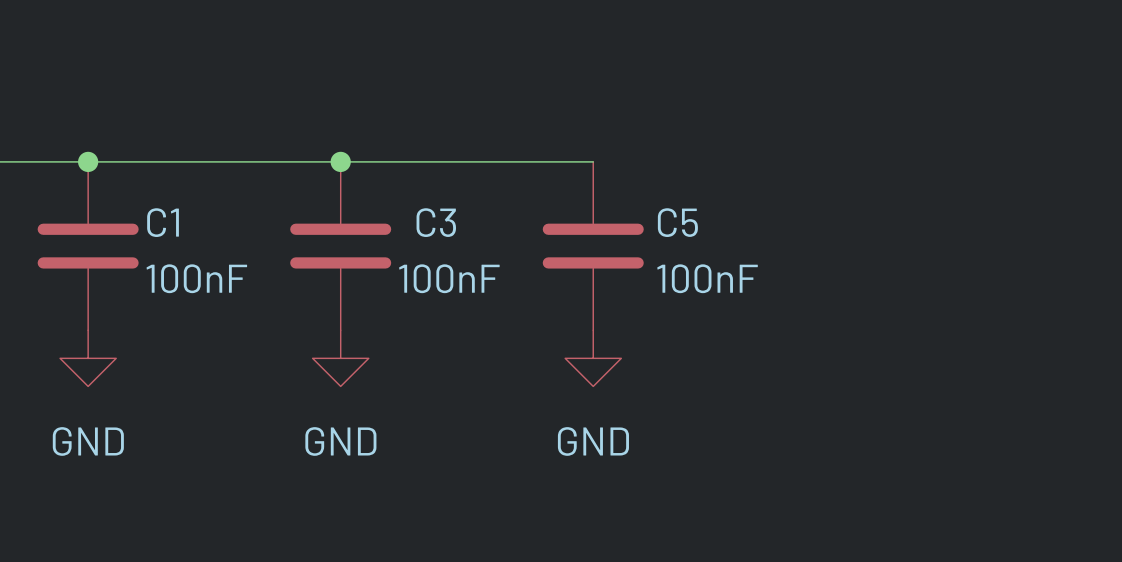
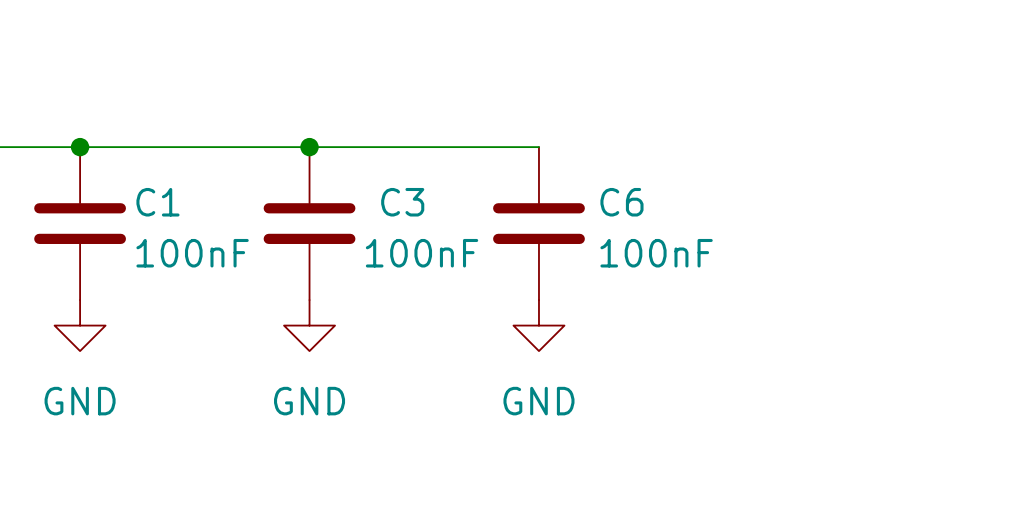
C5 name: C5 (677, 222) -> C6 (621, 202)

